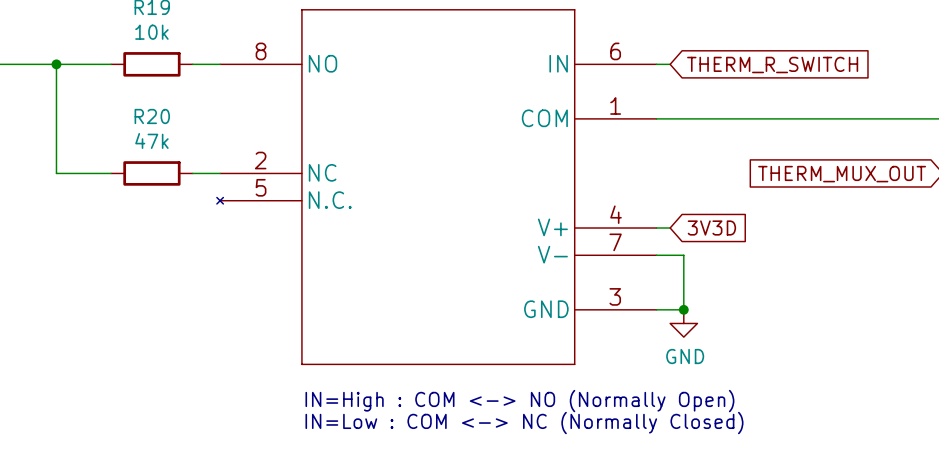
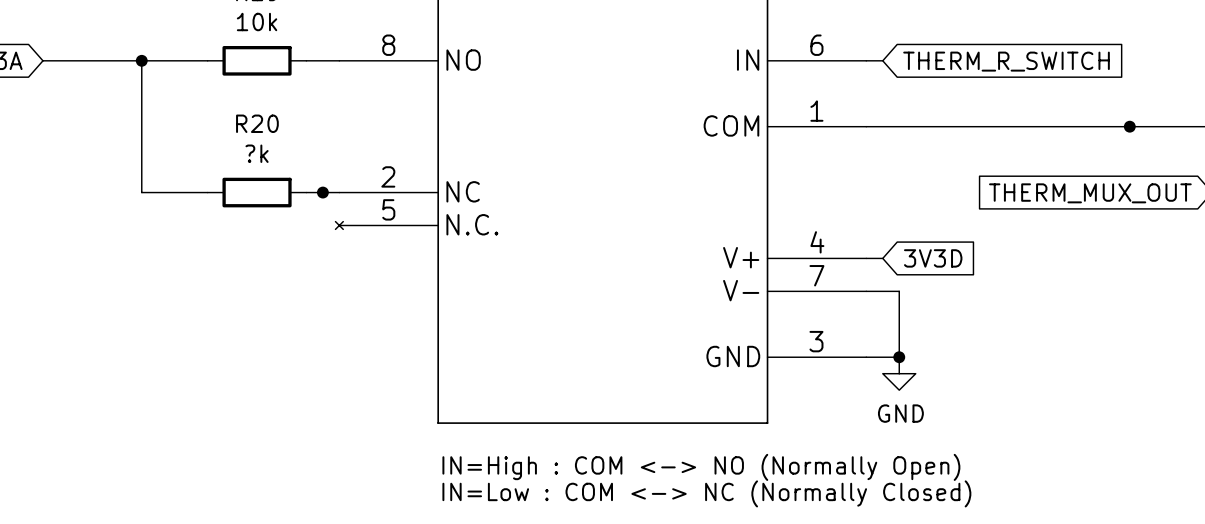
junction: none -> (1129, 126)
R20 value: 47k (151, 140) -> ?k (257, 153)
junction: none -> (322, 192)

